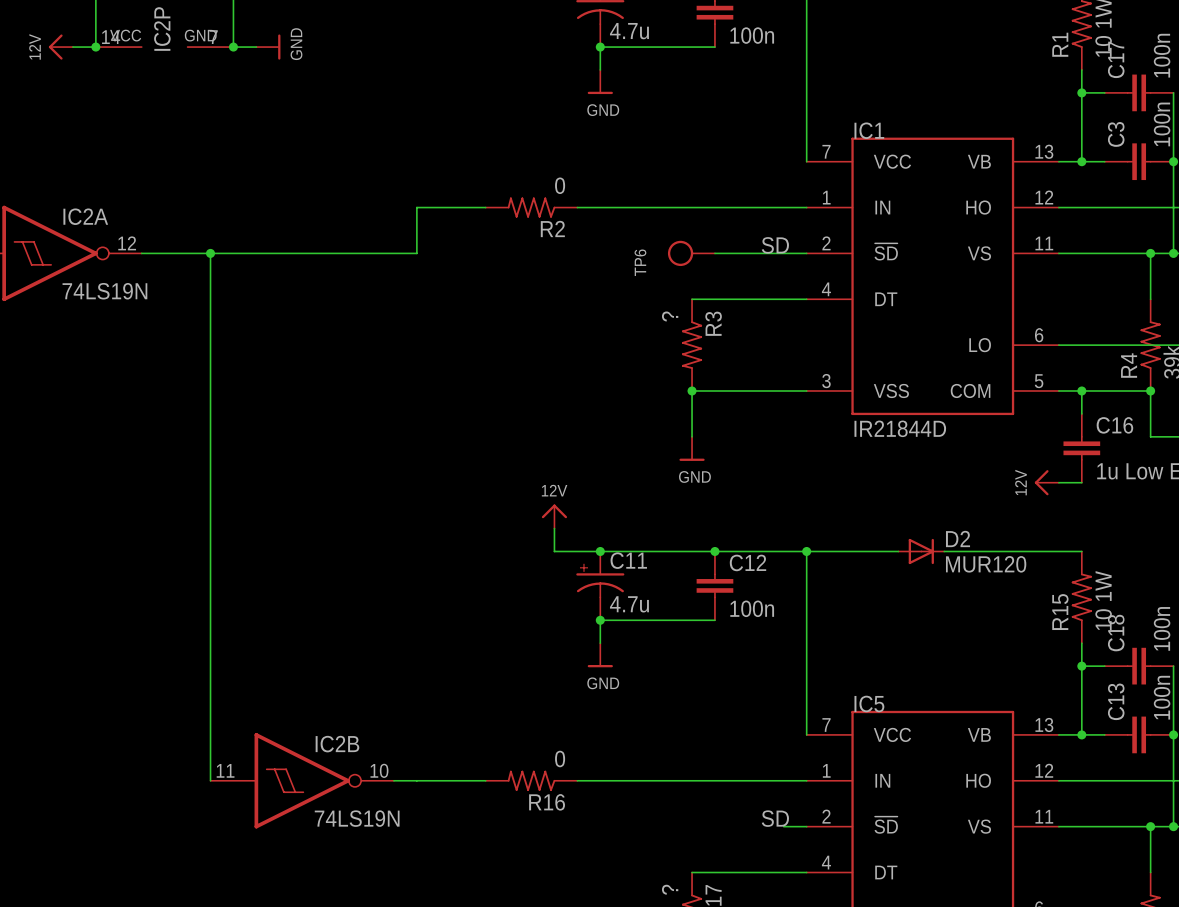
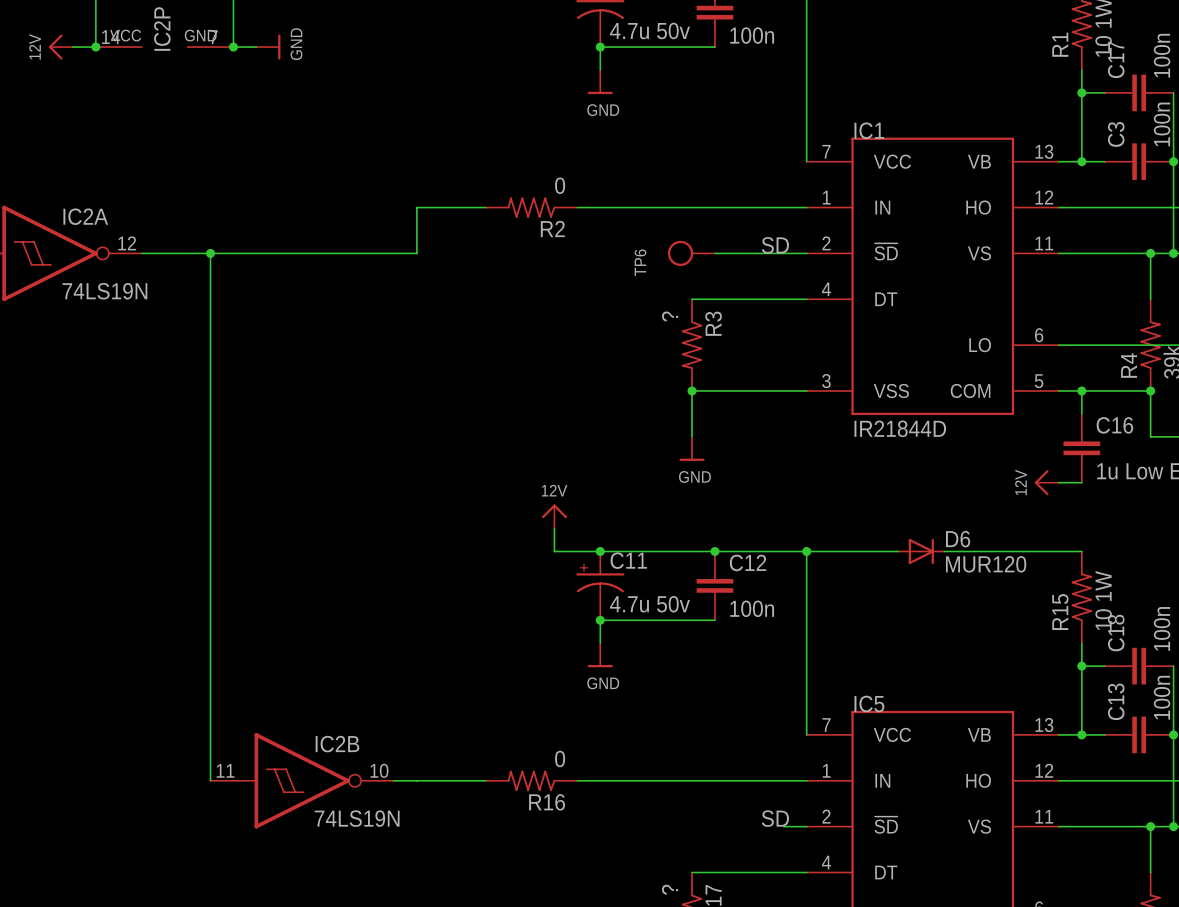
part value: 4.7u (629, 31) -> 4.7u 50v (649, 30)
D2 name: D2 (958, 538) -> D6 (958, 539)
C11 value: 4.7u (629, 604) -> 4.7u 50v (649, 604)

